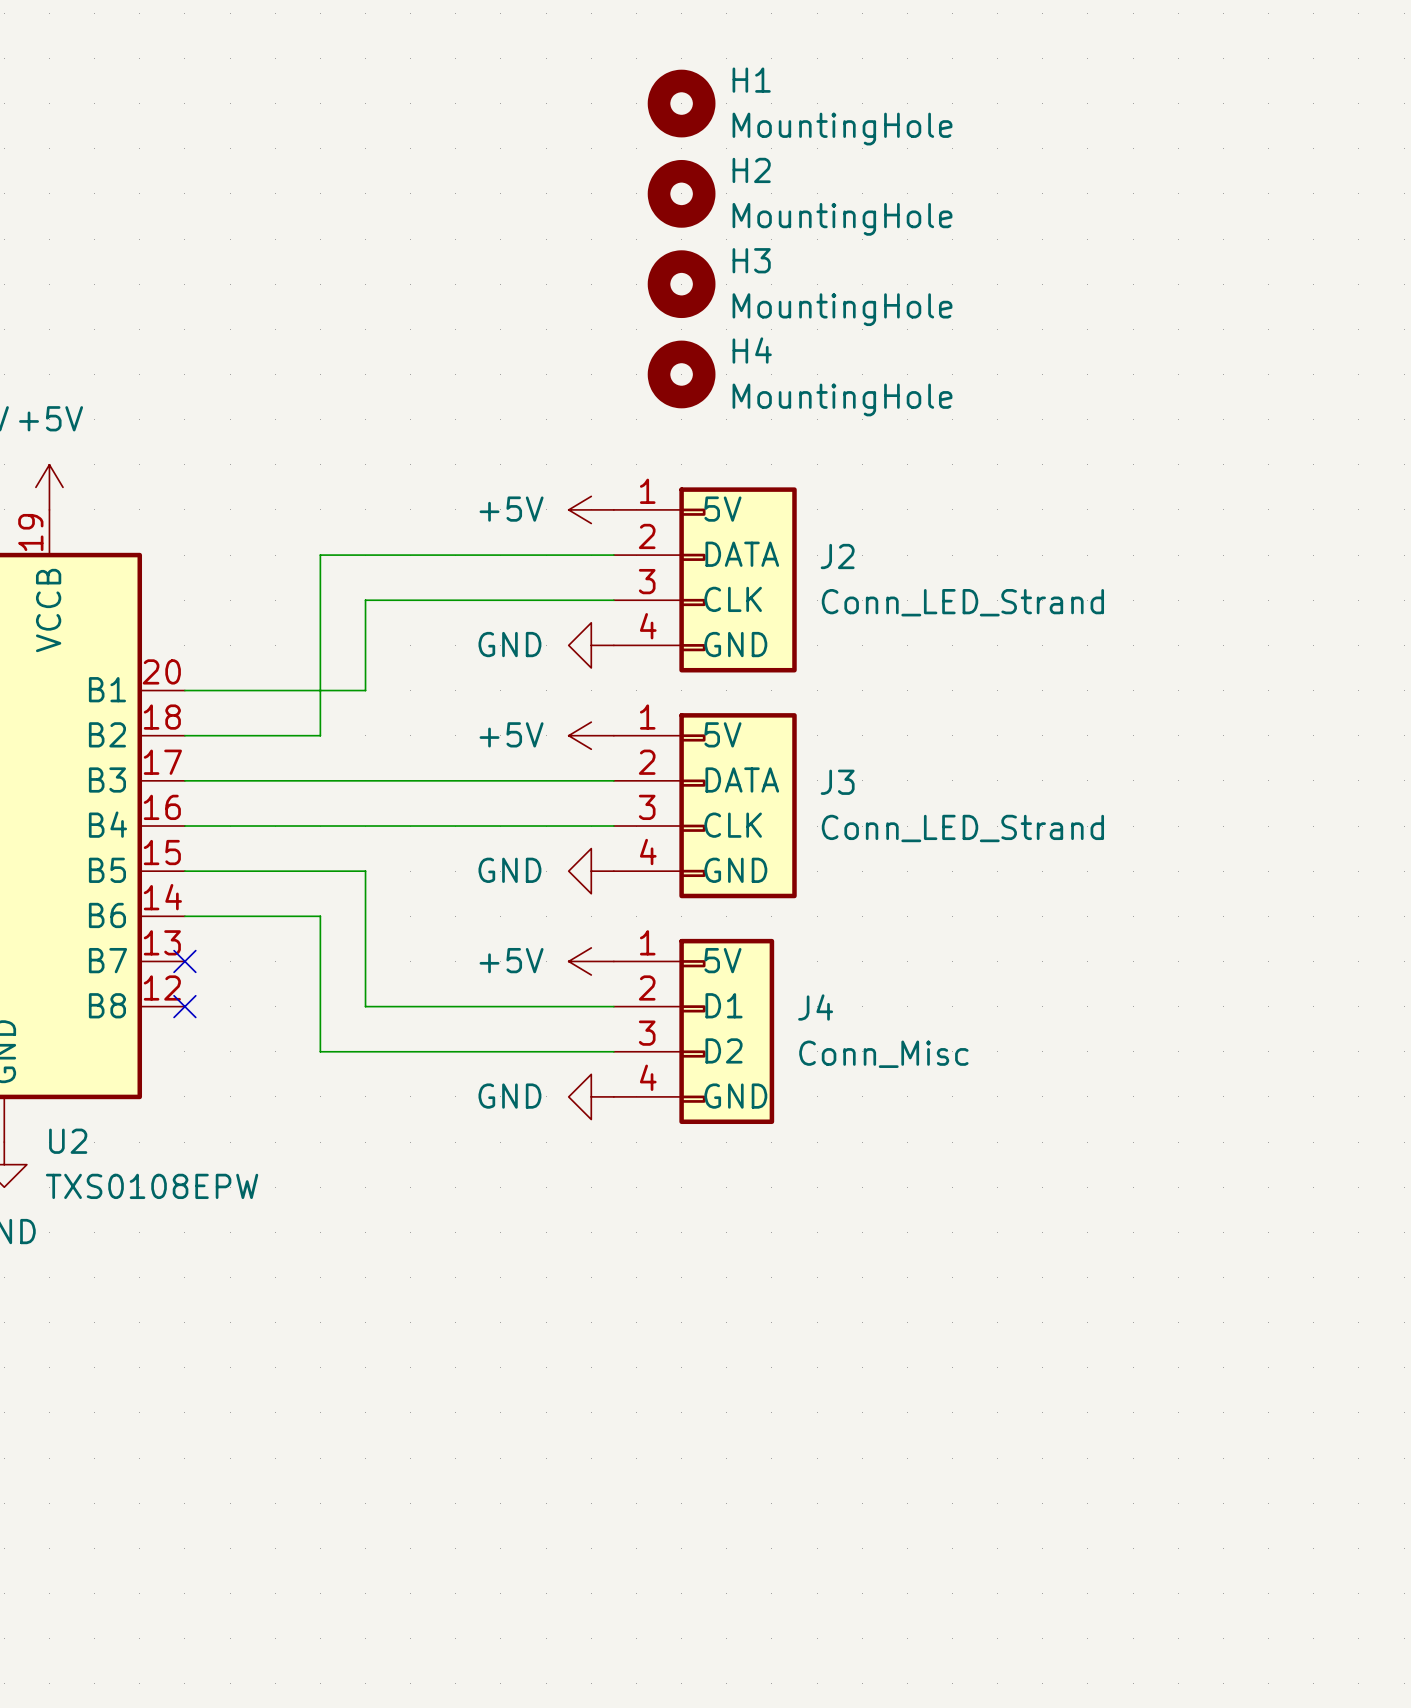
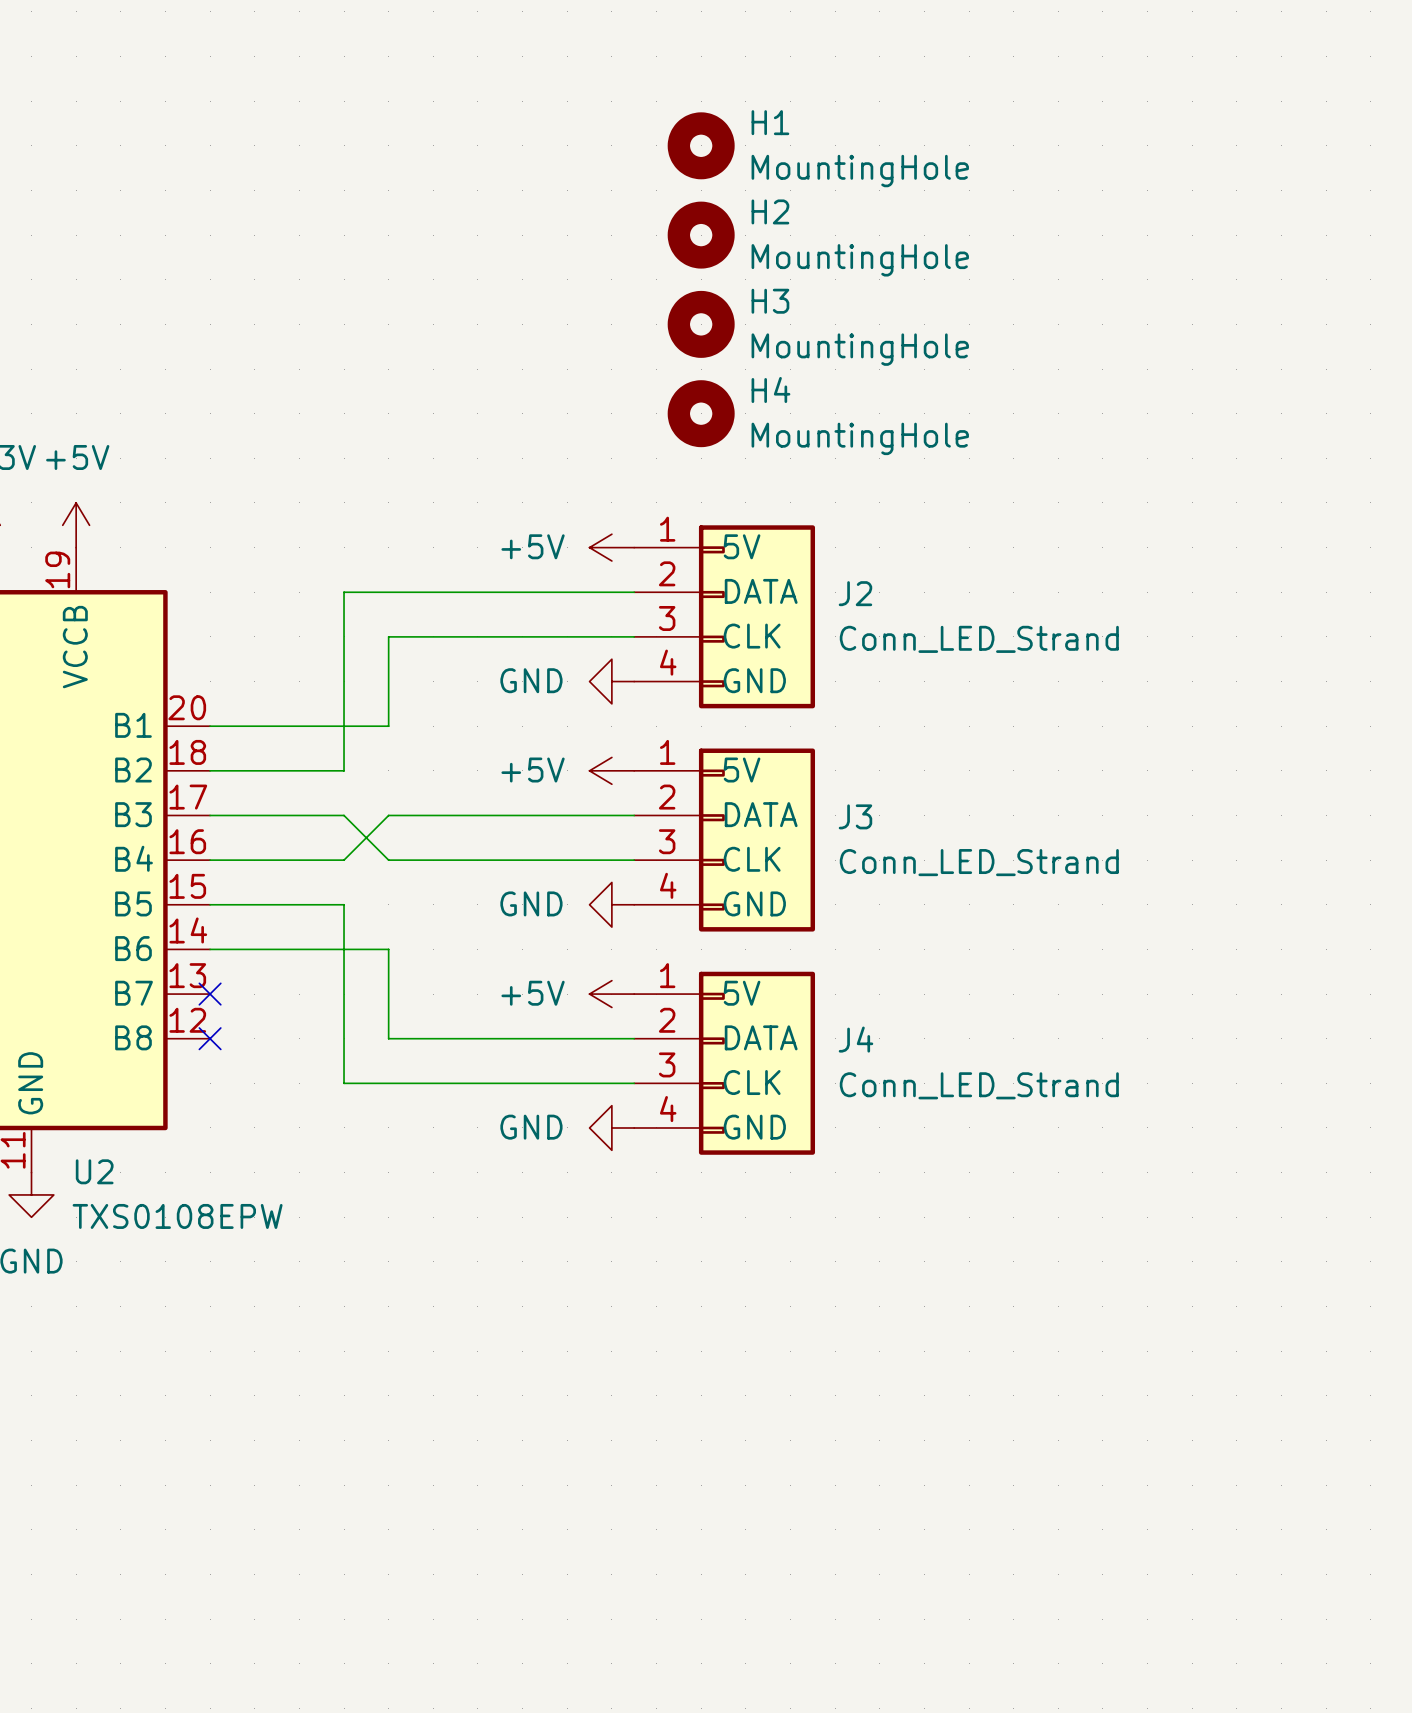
wire: (320, 780) (365, 780) -> (344, 815) (388, 860)
wire: (320, 826) (365, 826) -> (344, 860) (388, 815)
wire: (320, 871) (365, 871) (365, 916) -> (344, 904) (344, 949) (388, 949)
J4 symbol: [613, 938, 775, 1125] -> [634, 971, 816, 1155]
J4 value: Conn_Misc (883, 1054) -> Conn_LED_Strand (979, 1085)

